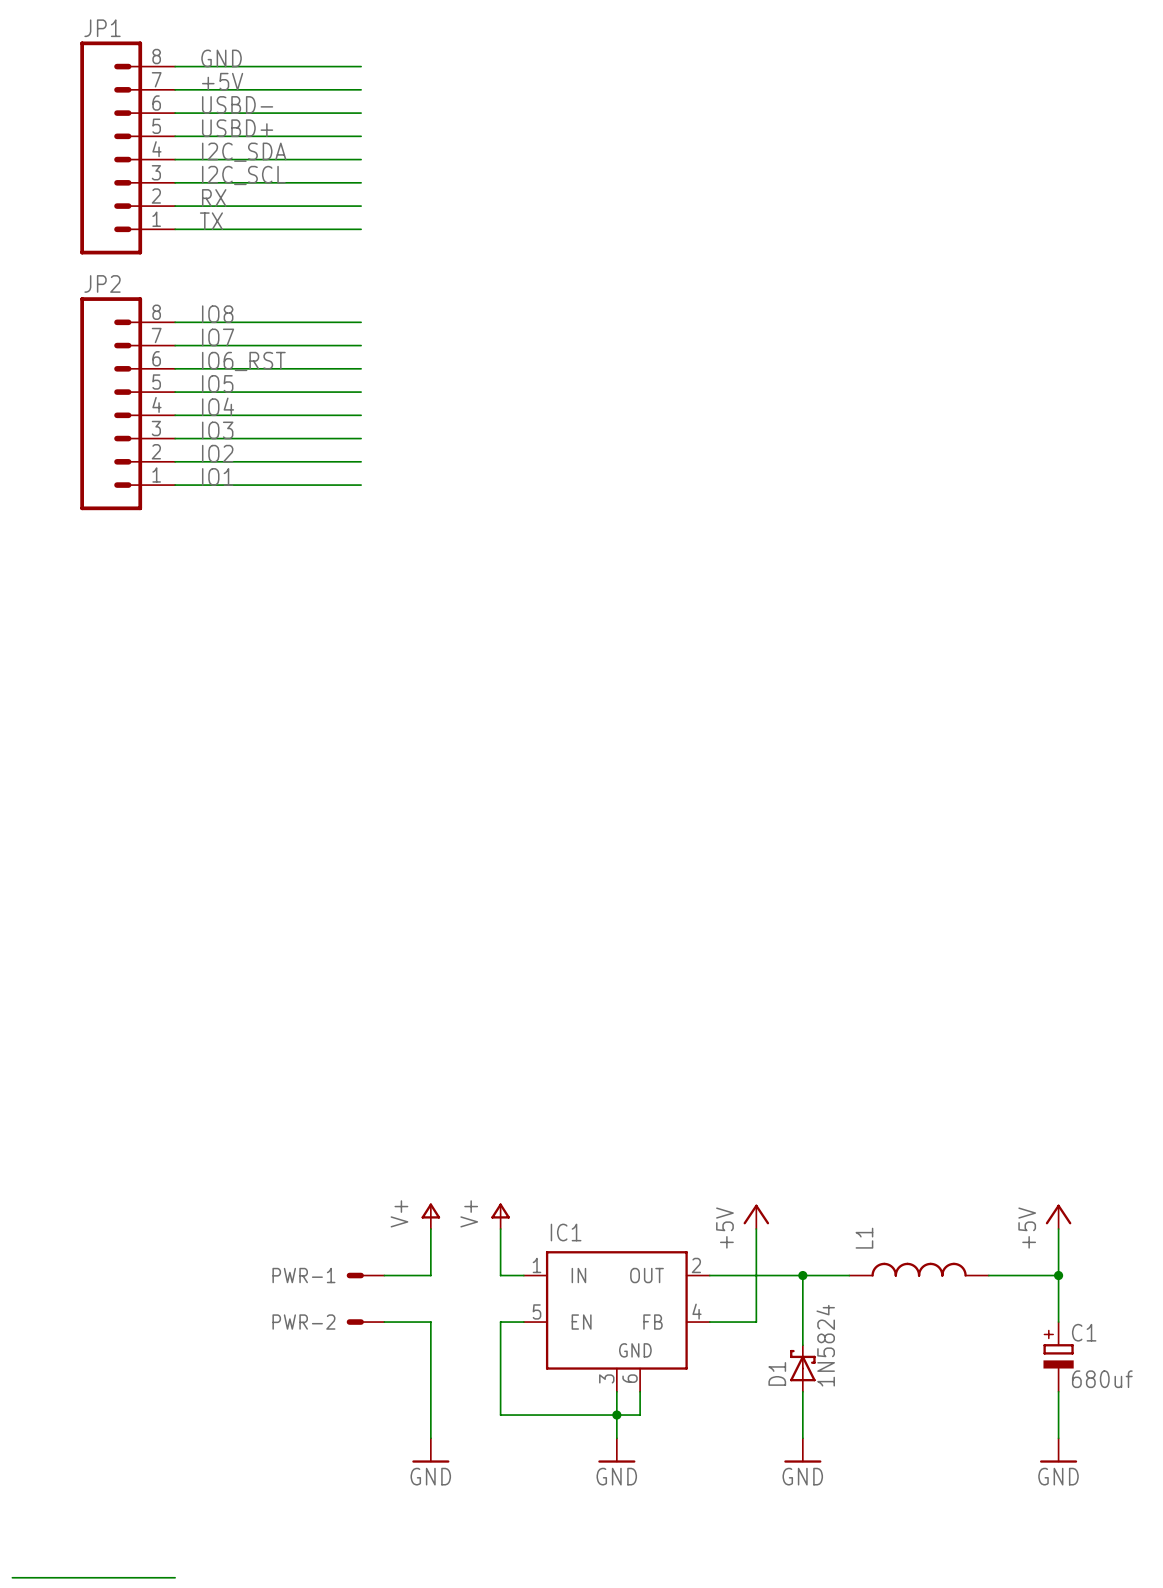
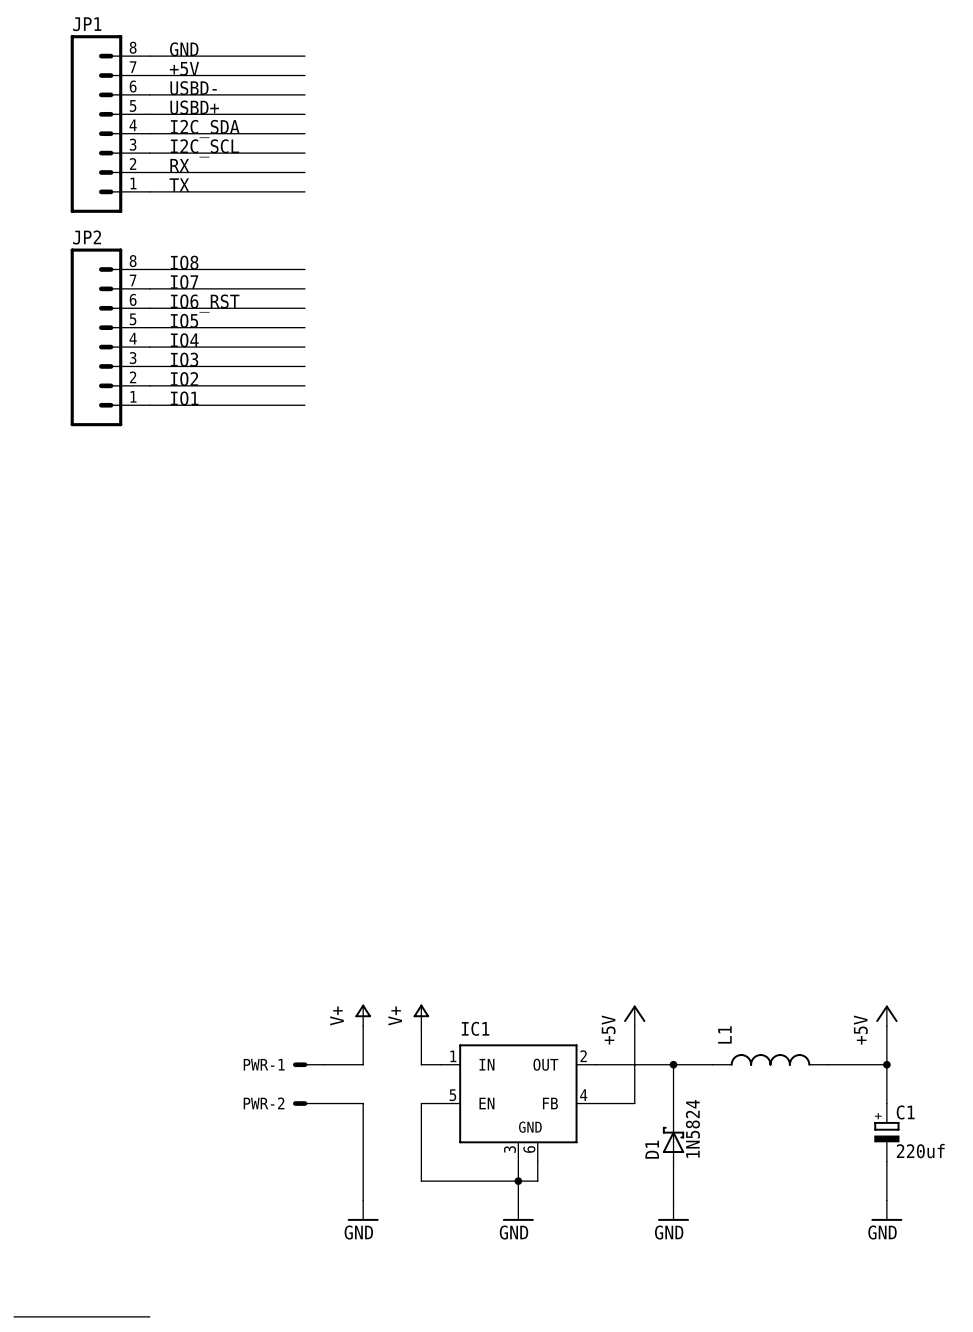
C1 value: 680uf (1102, 1379) -> 220uf (920, 1151)

